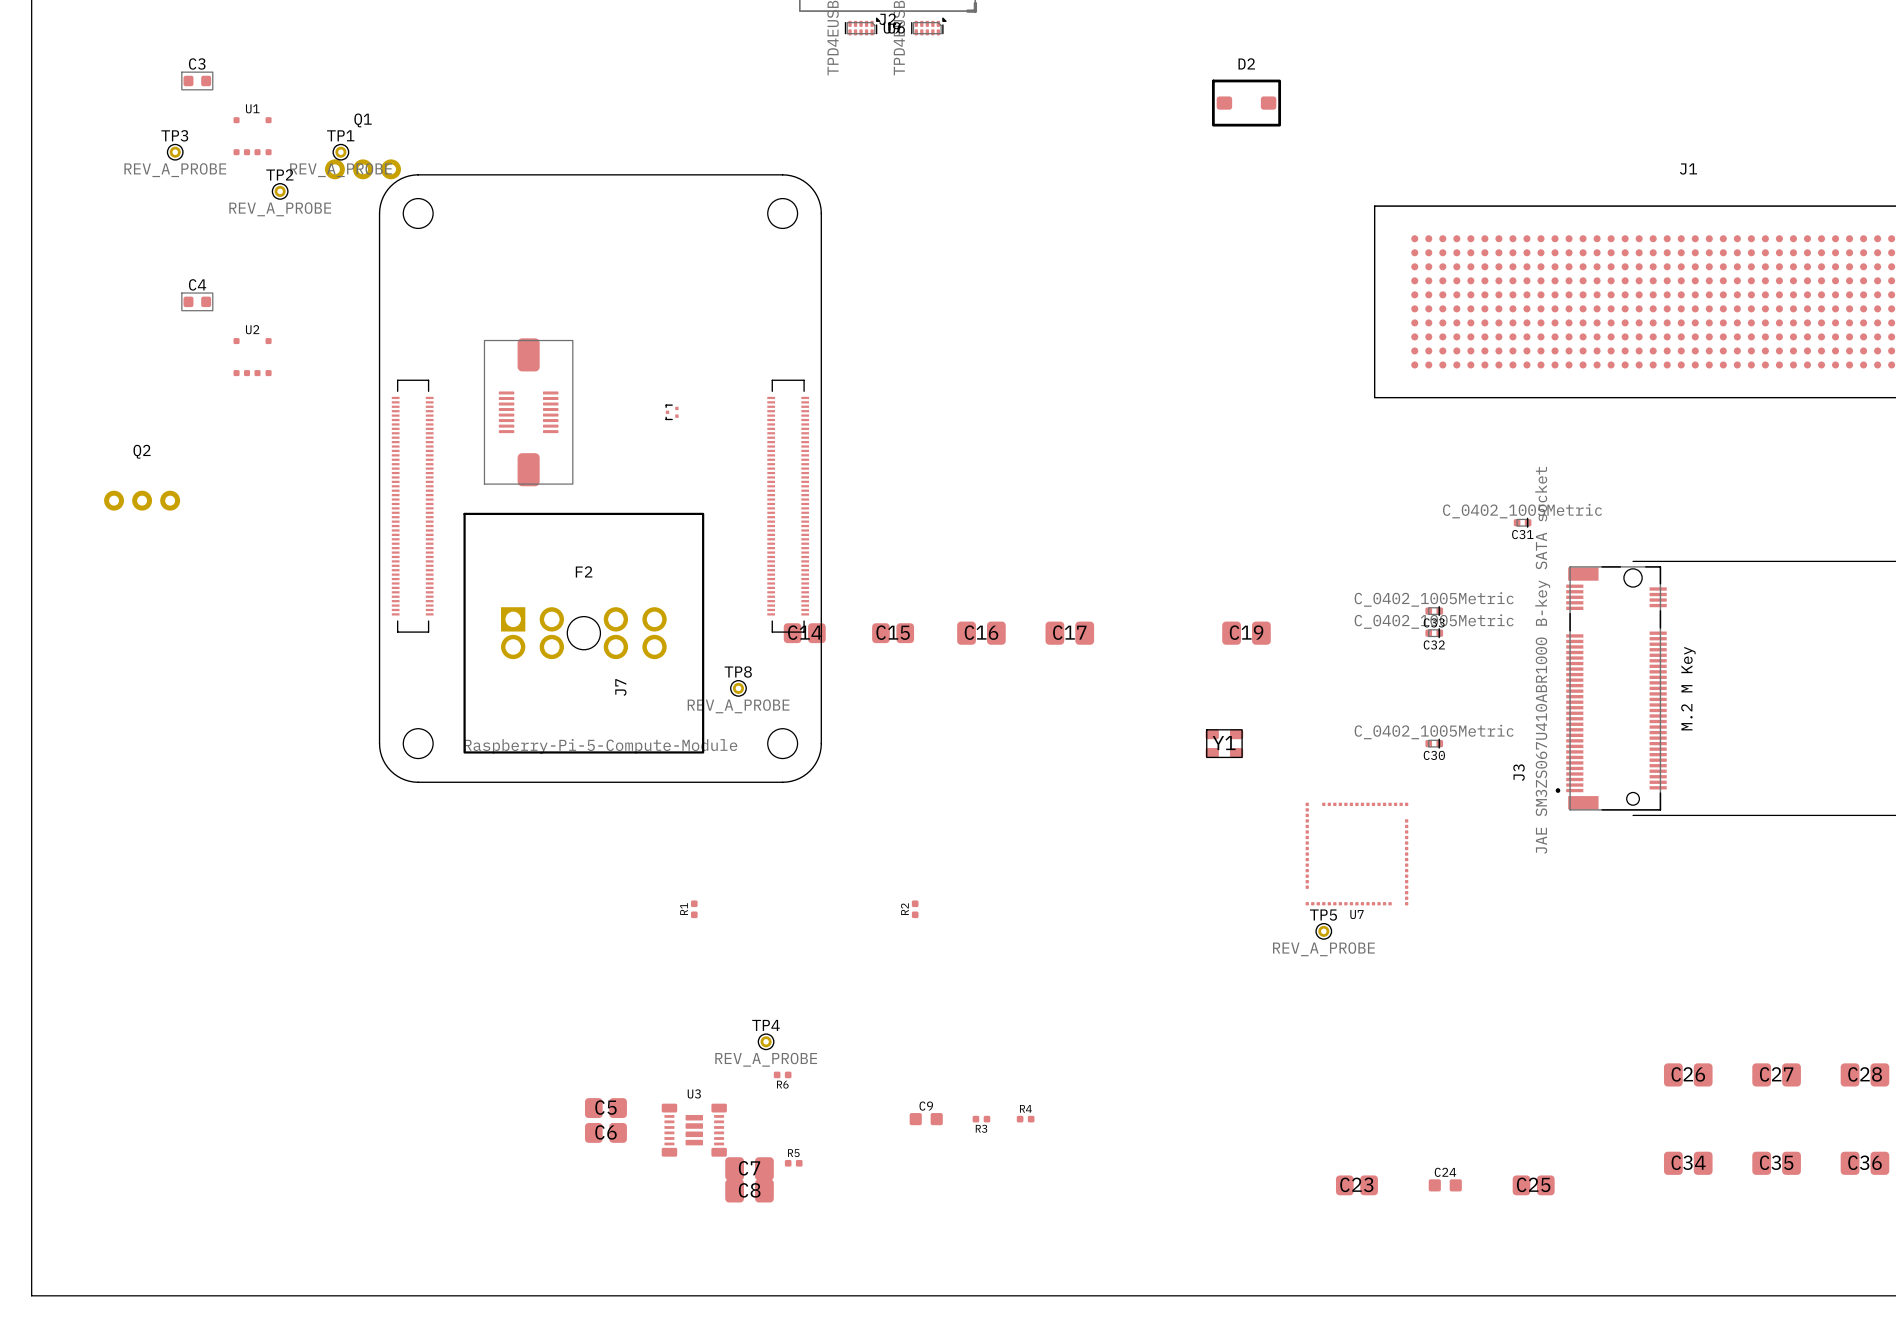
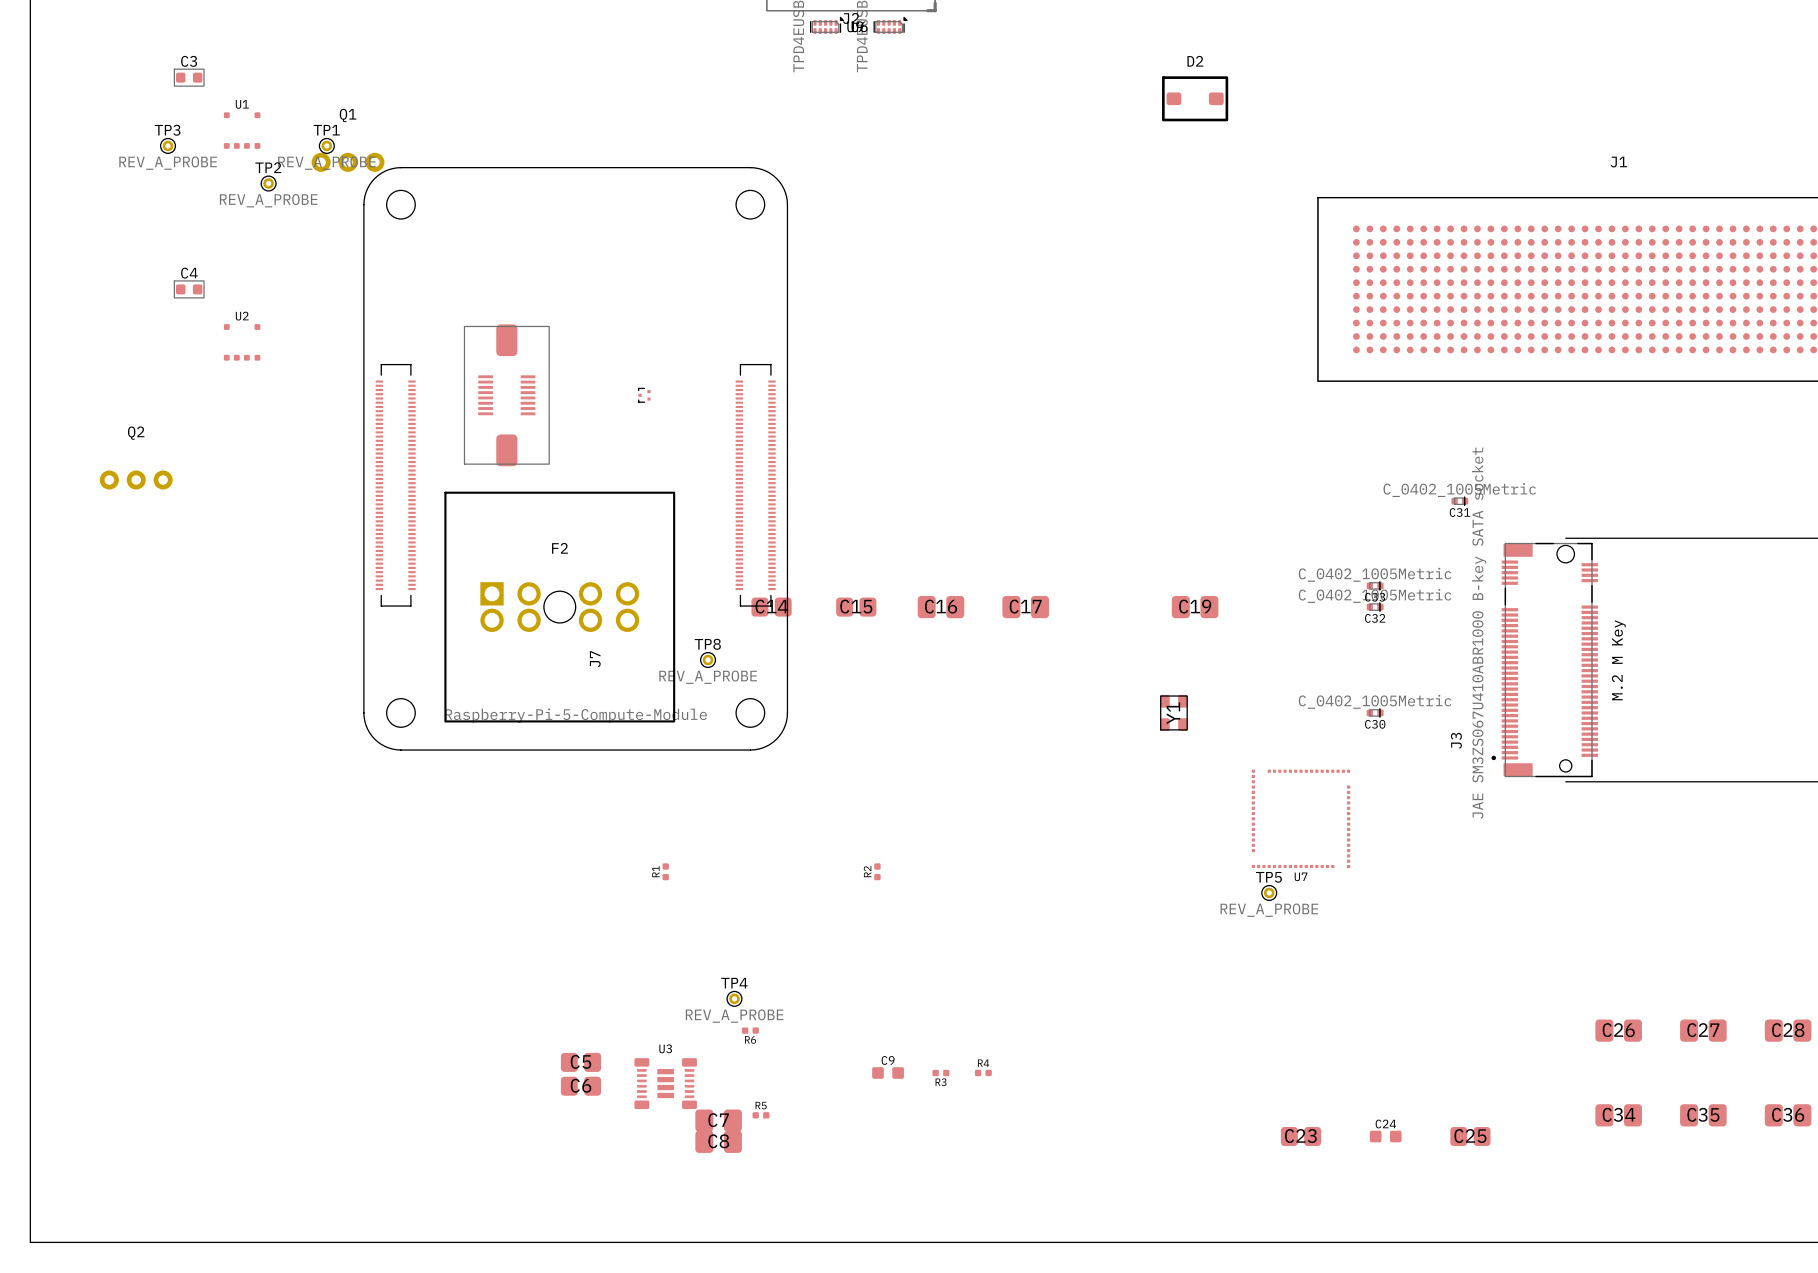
Y1 rotation: 0° (1224, 743) -> 90° clockwise (1173, 712)

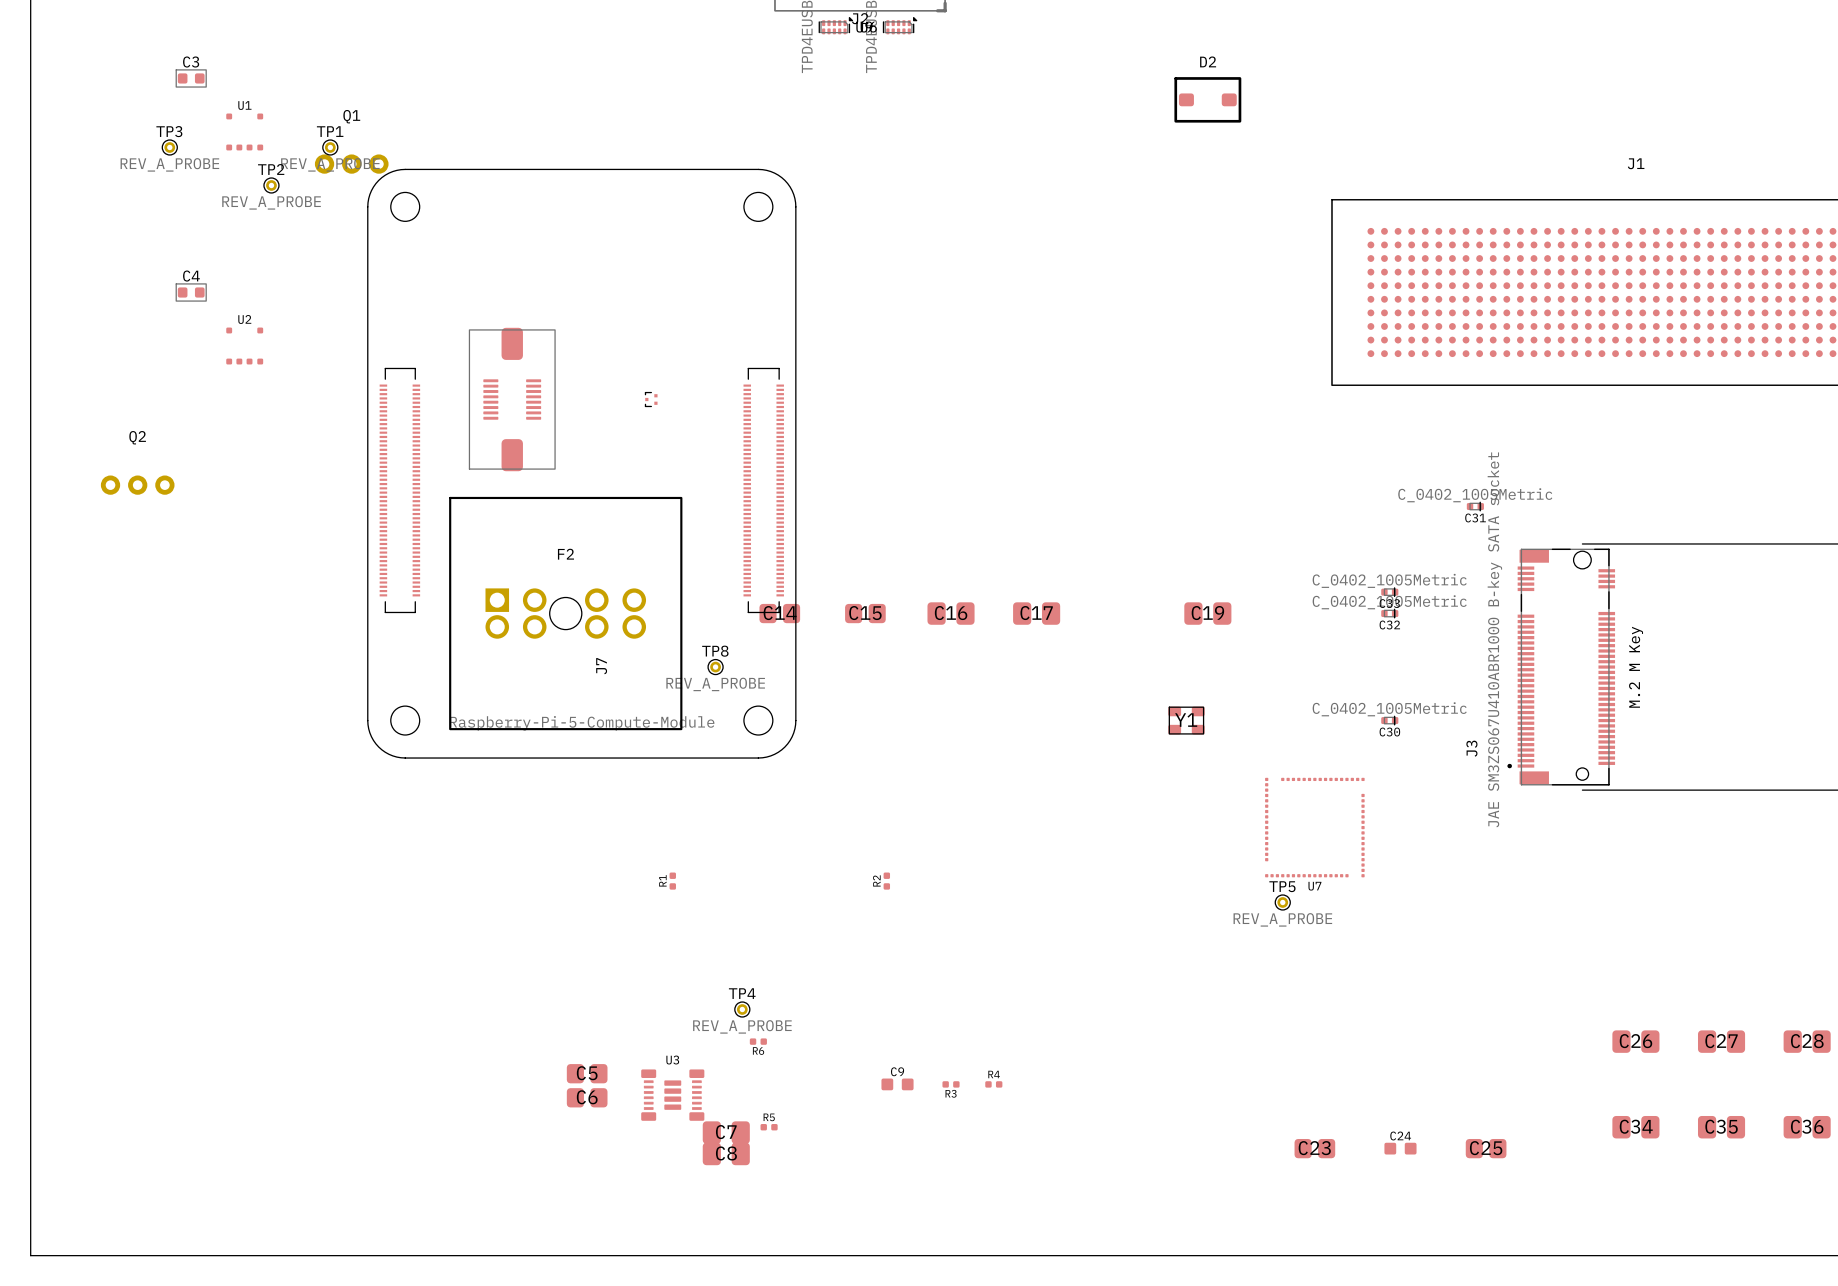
Y1 rotation: 0° (1173, 712) -> 90° clockwise (1186, 720)

